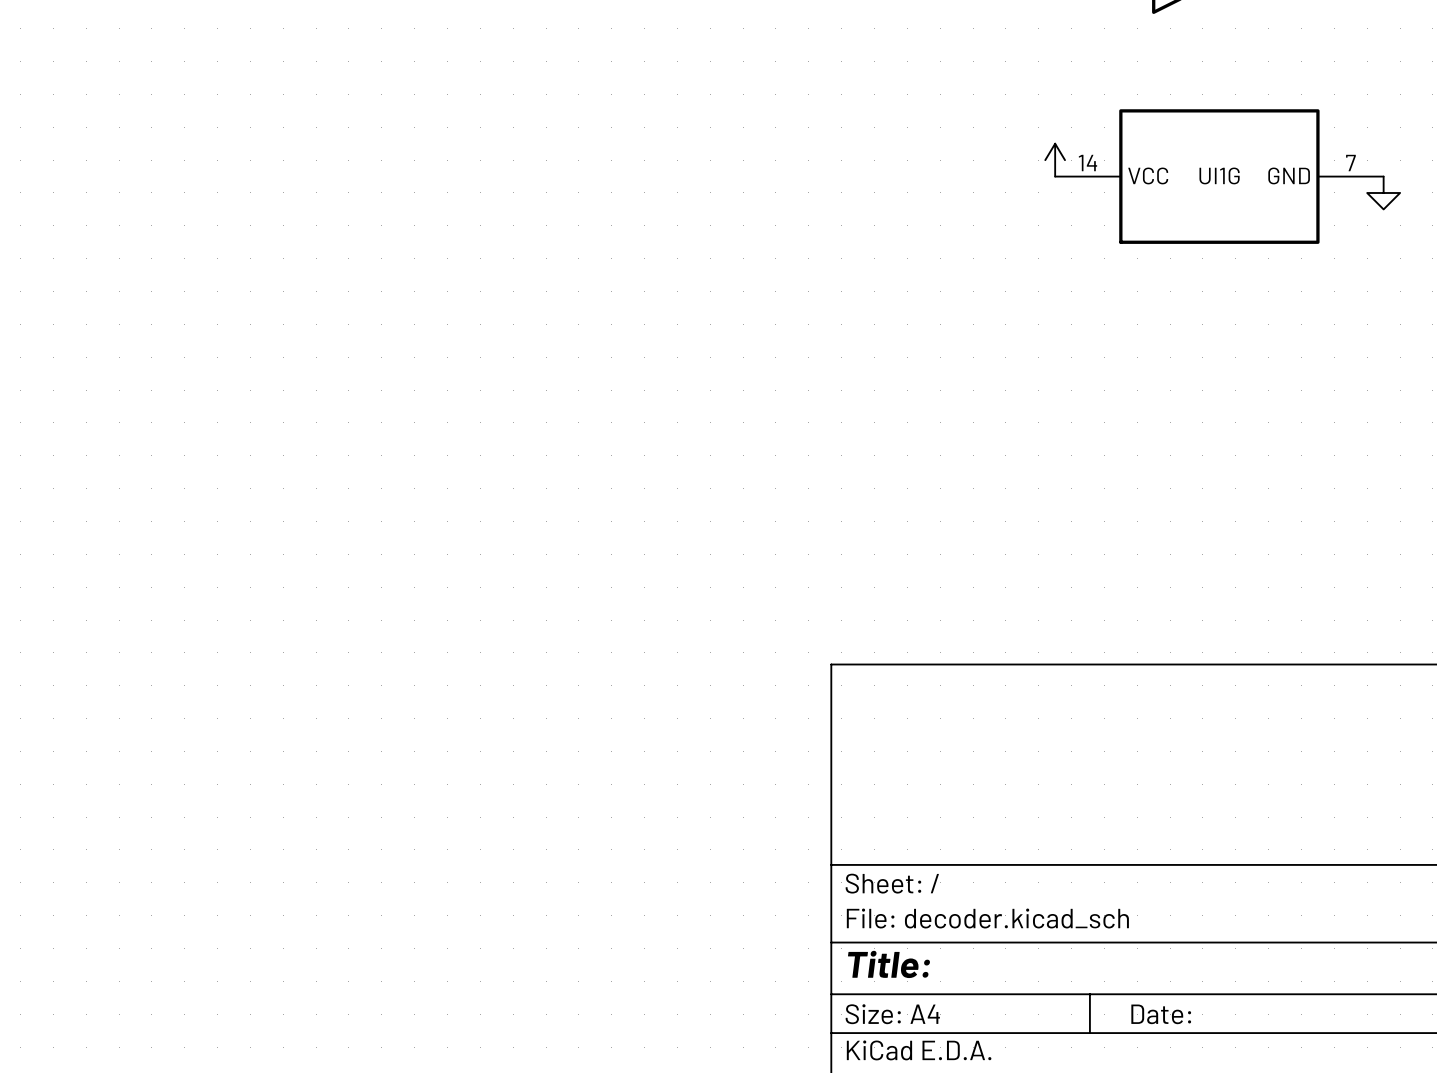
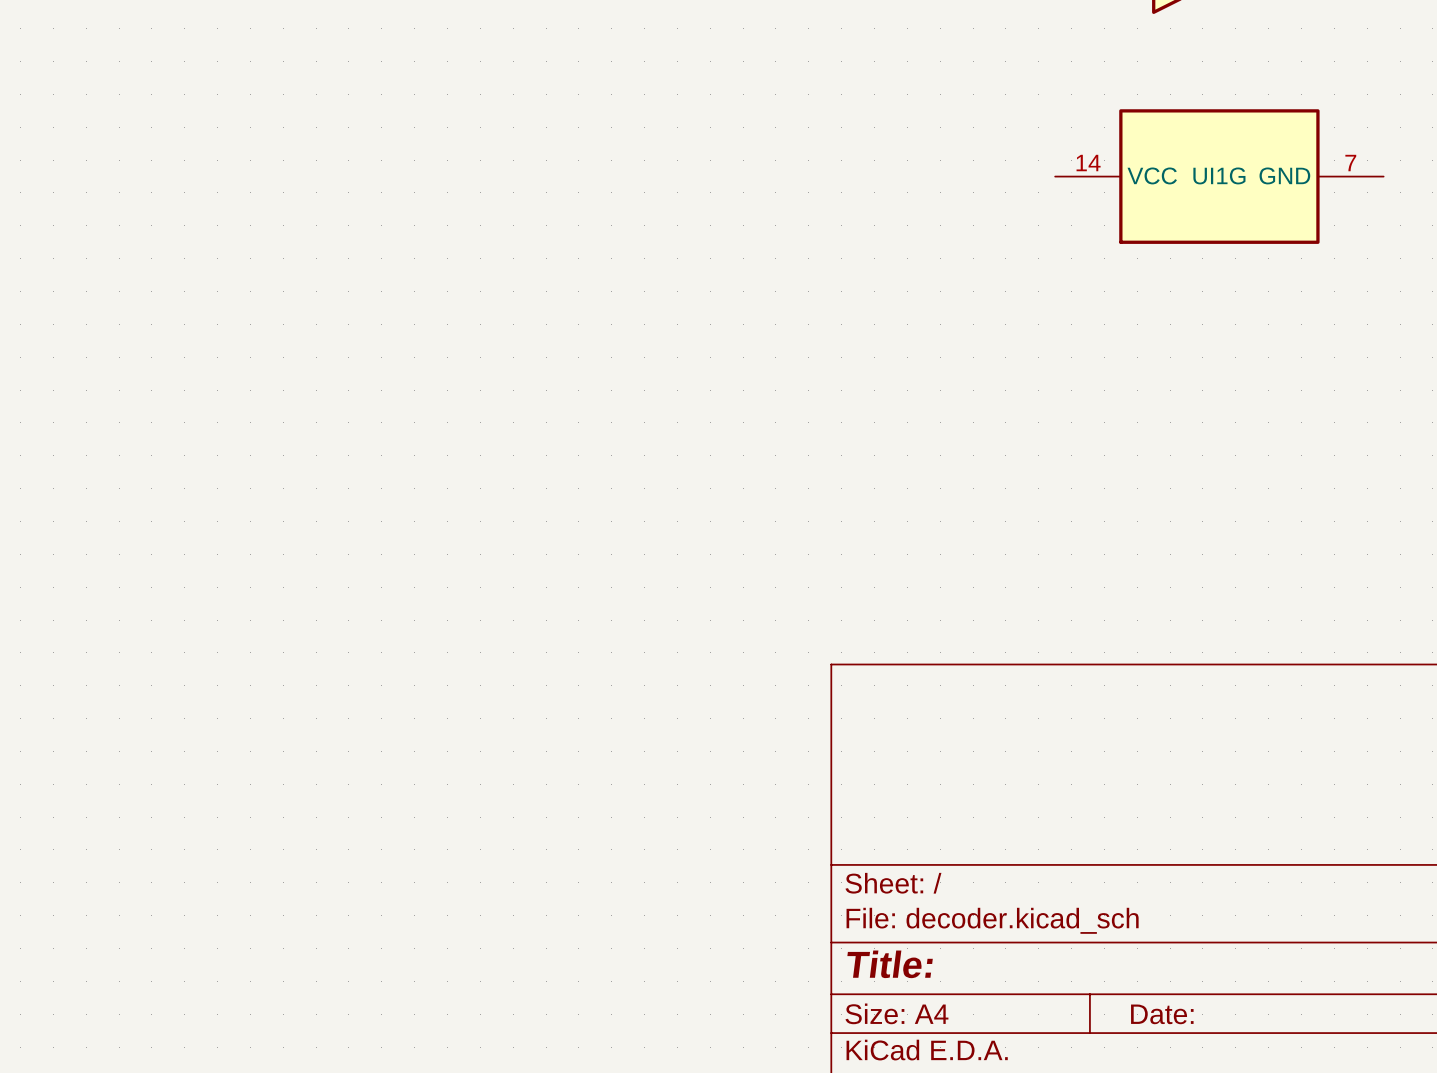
power symbol: (1055, 160) -> none
power symbol: (1383, 192) -> none

